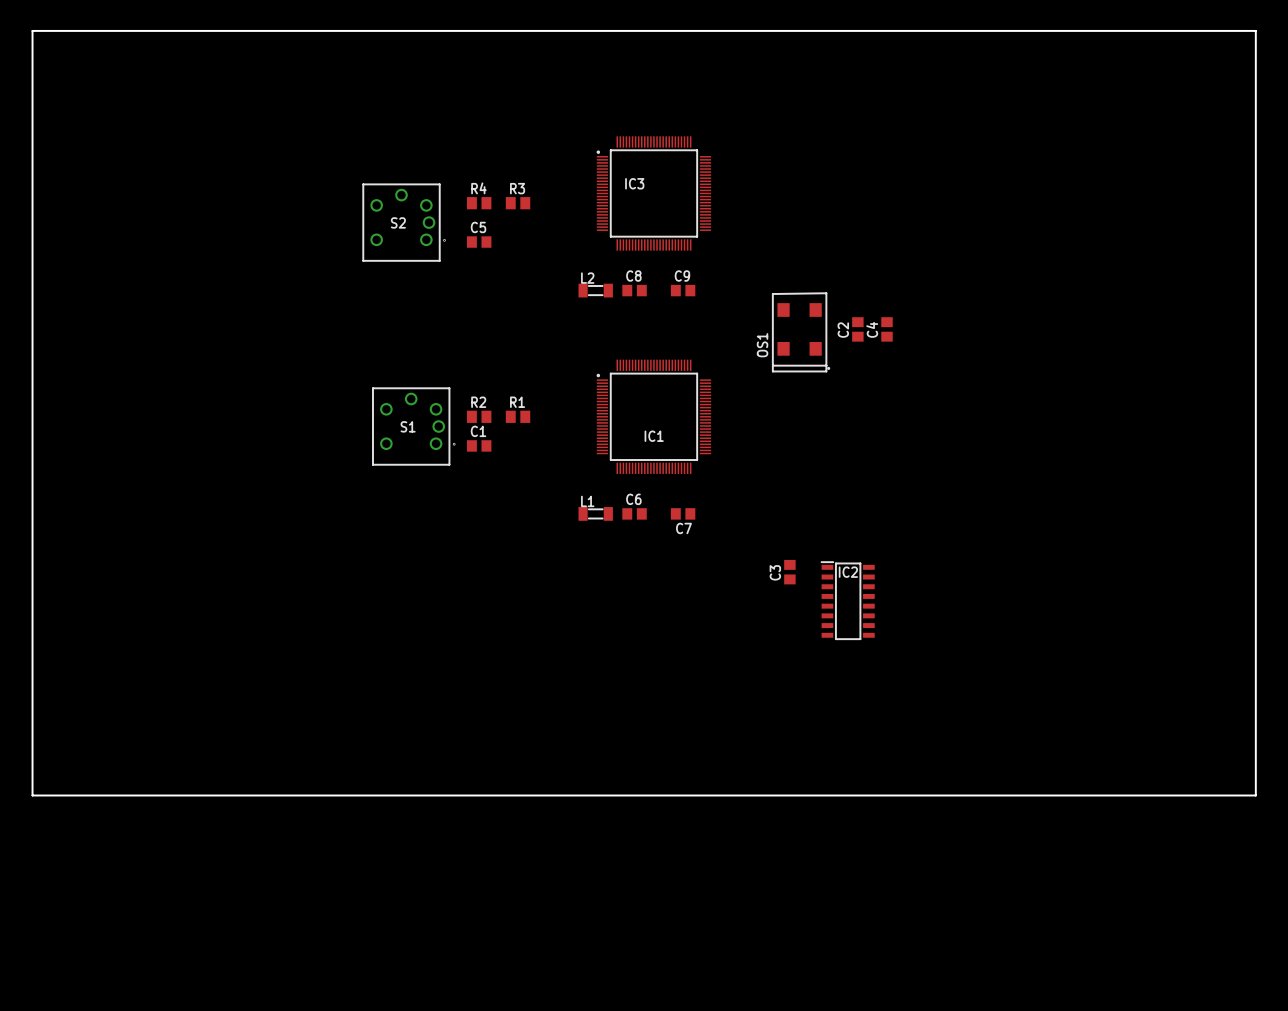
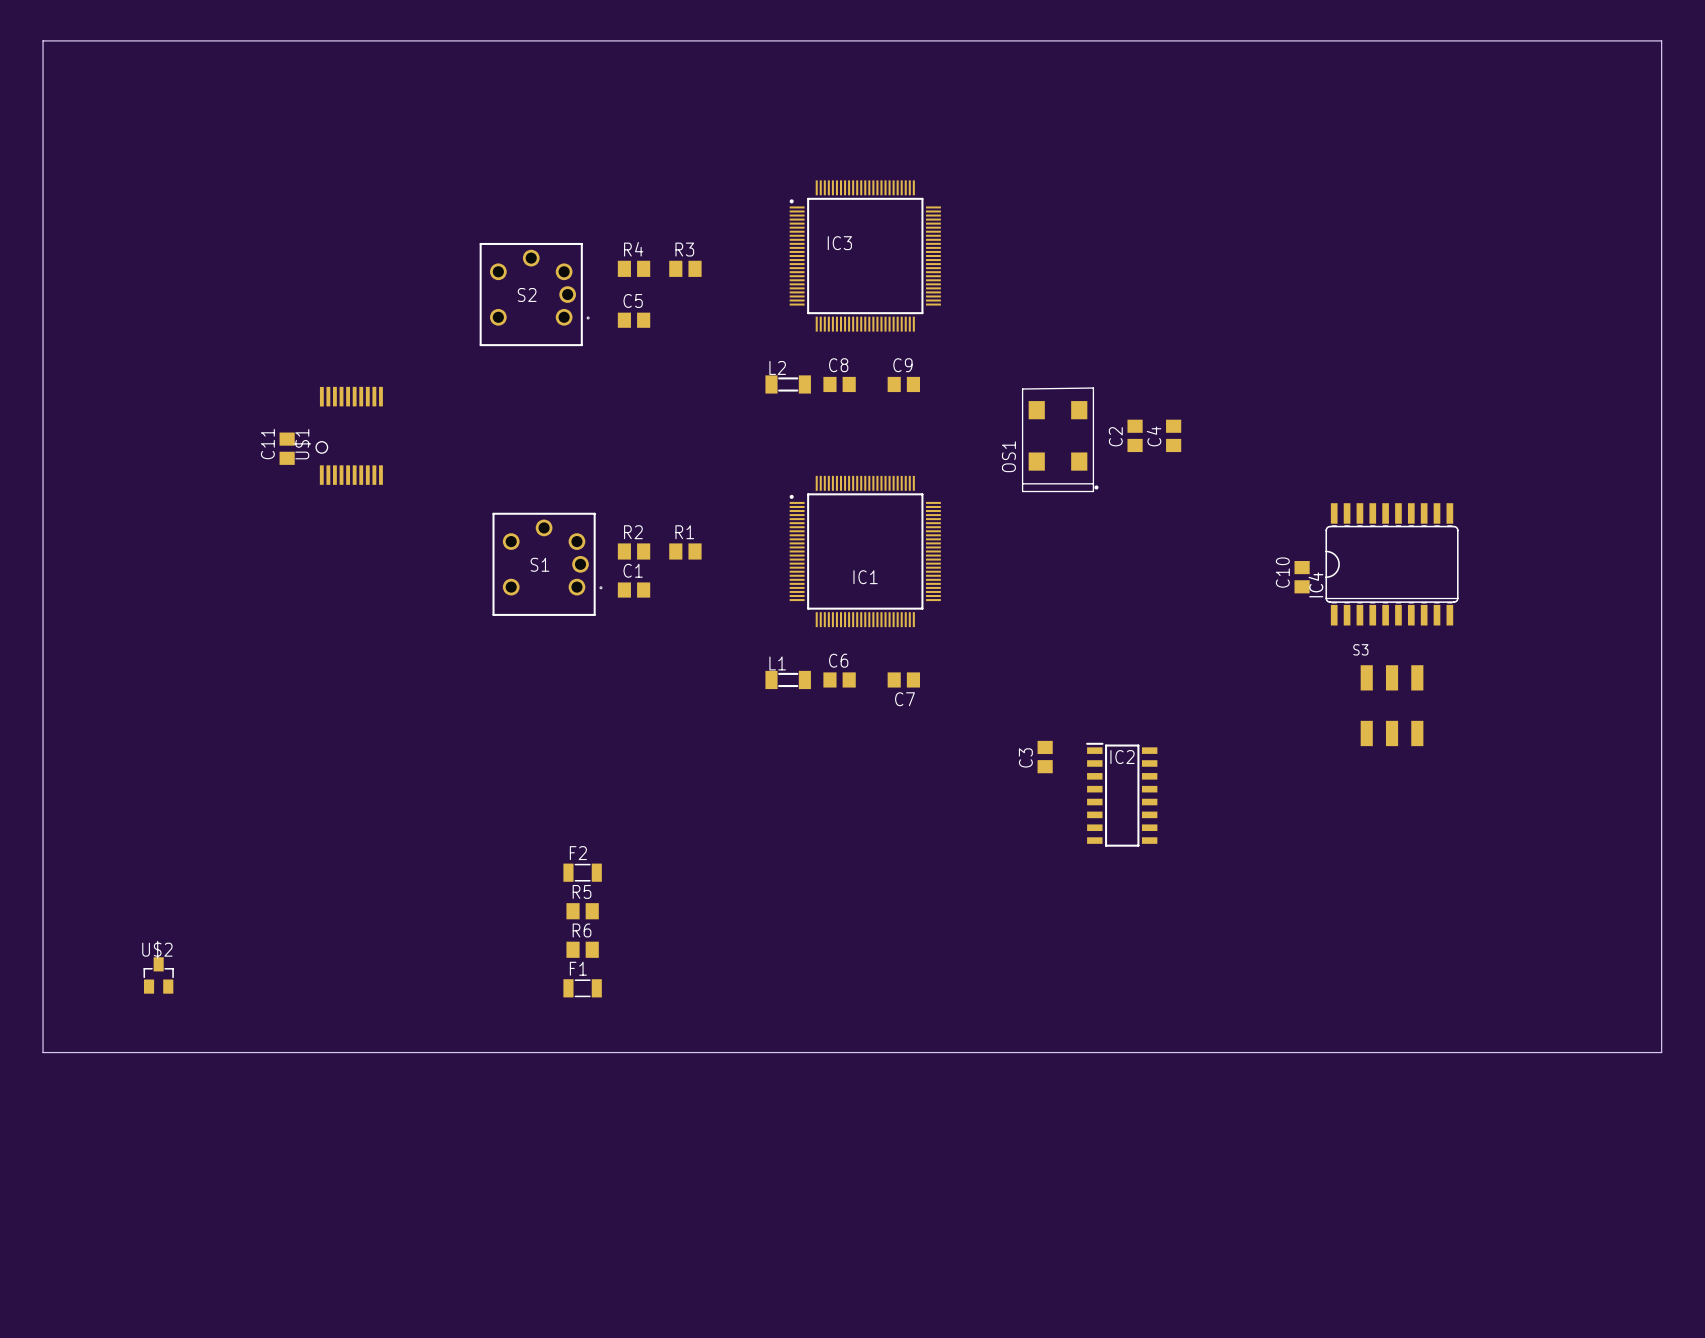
U$1: none -> (349, 435)
C11: none -> (287, 448)
IC4: none -> (1392, 564)
C10: none -> (1302, 577)
S3: none -> (1392, 705)
F2: none -> (582, 872)
R5: none -> (582, 911)
R6: none -> (582, 949)
U$2: none -> (158, 975)
F1: none -> (582, 988)

